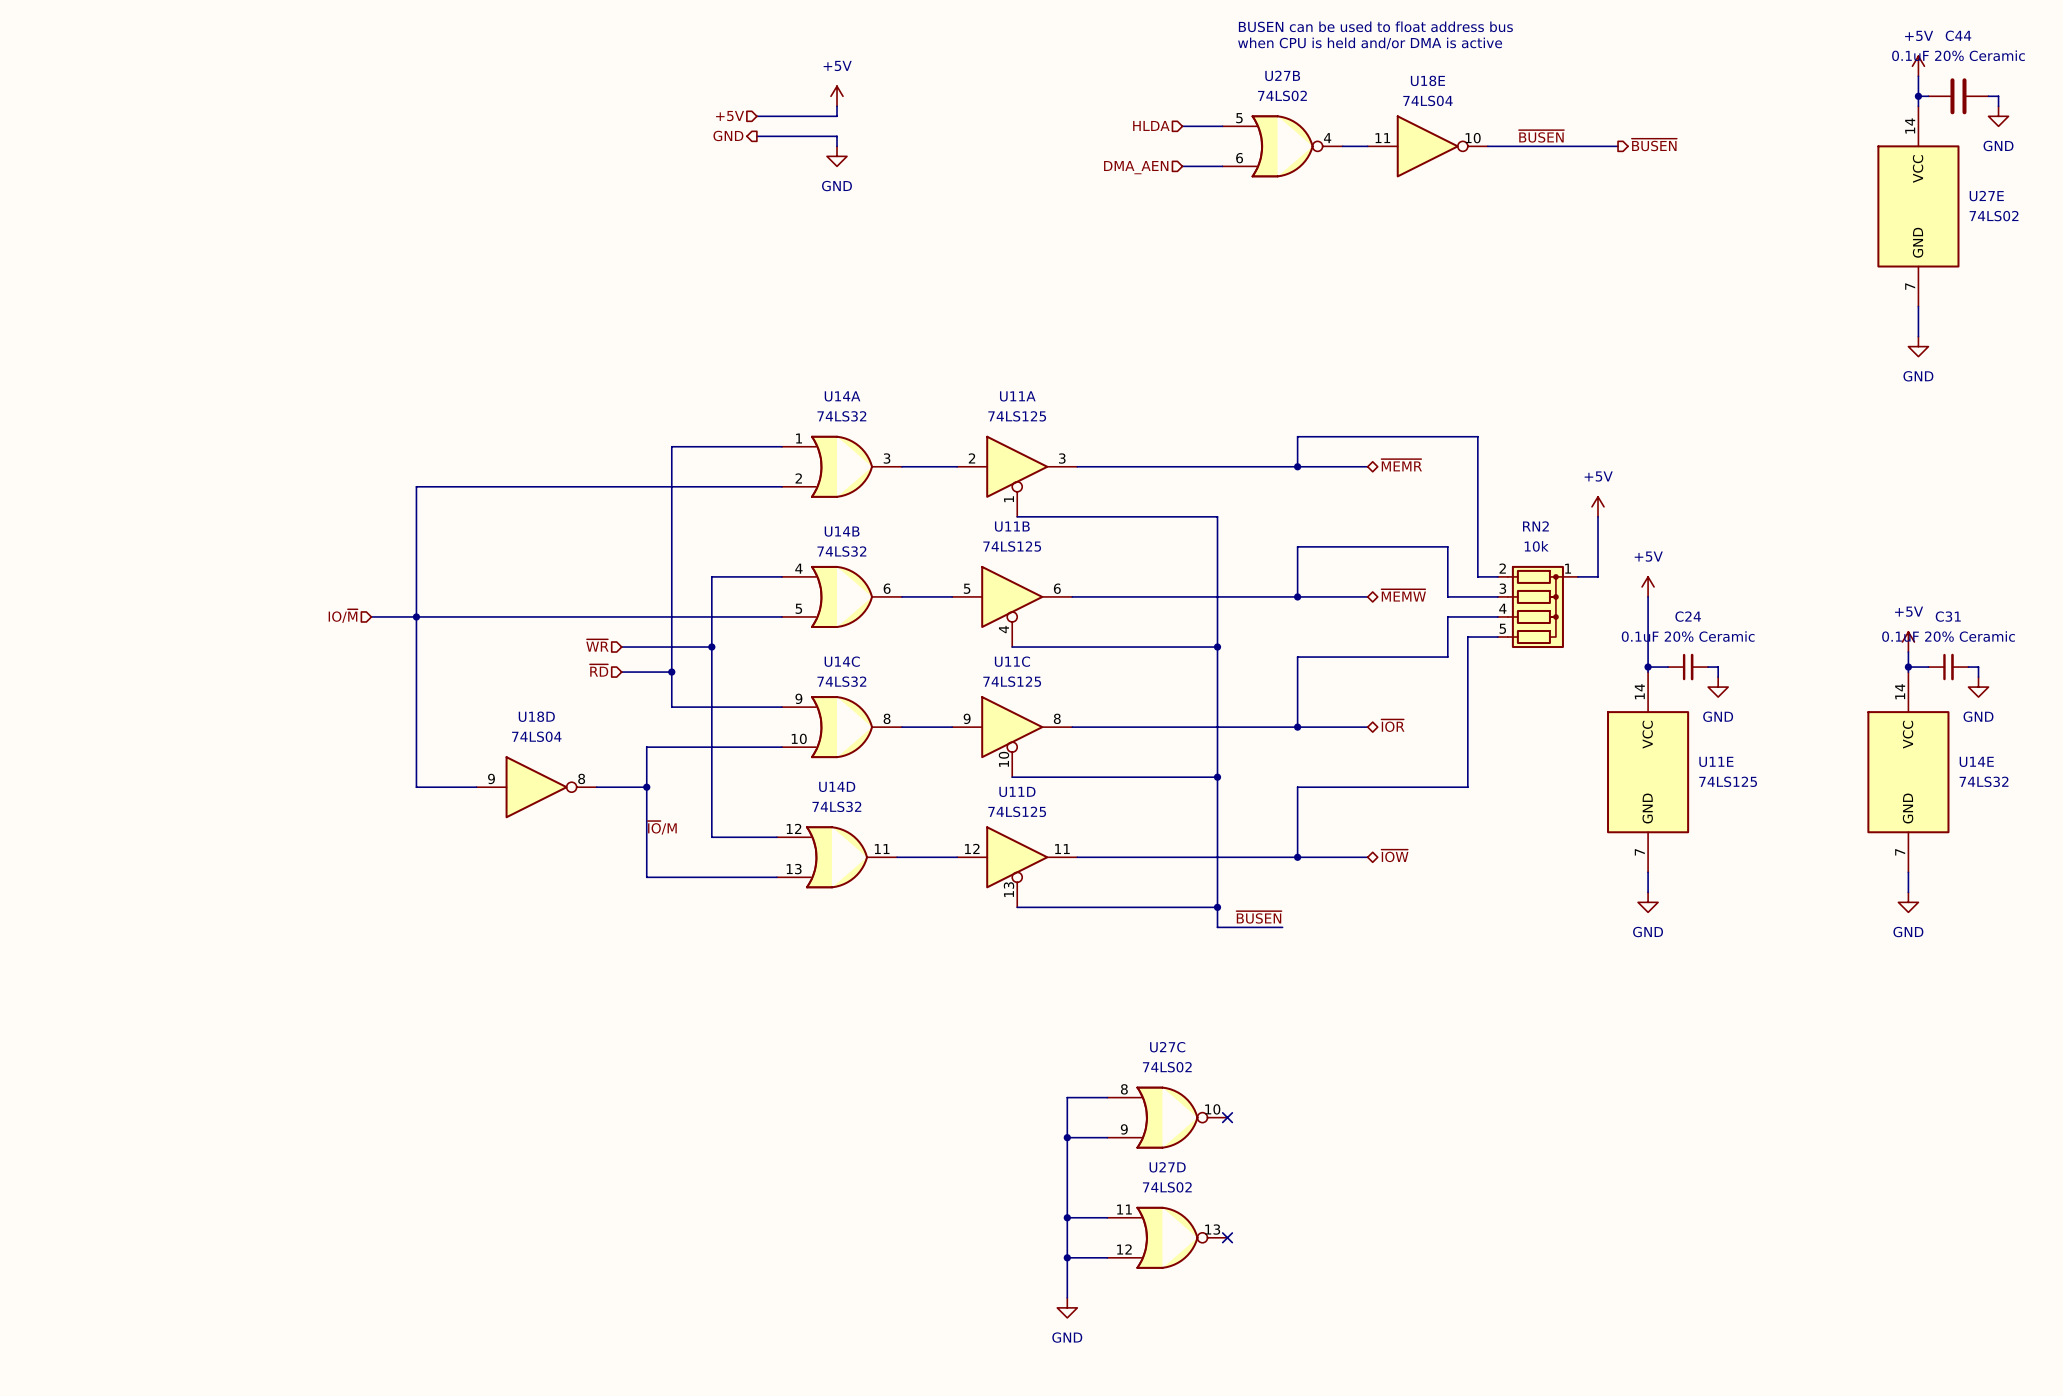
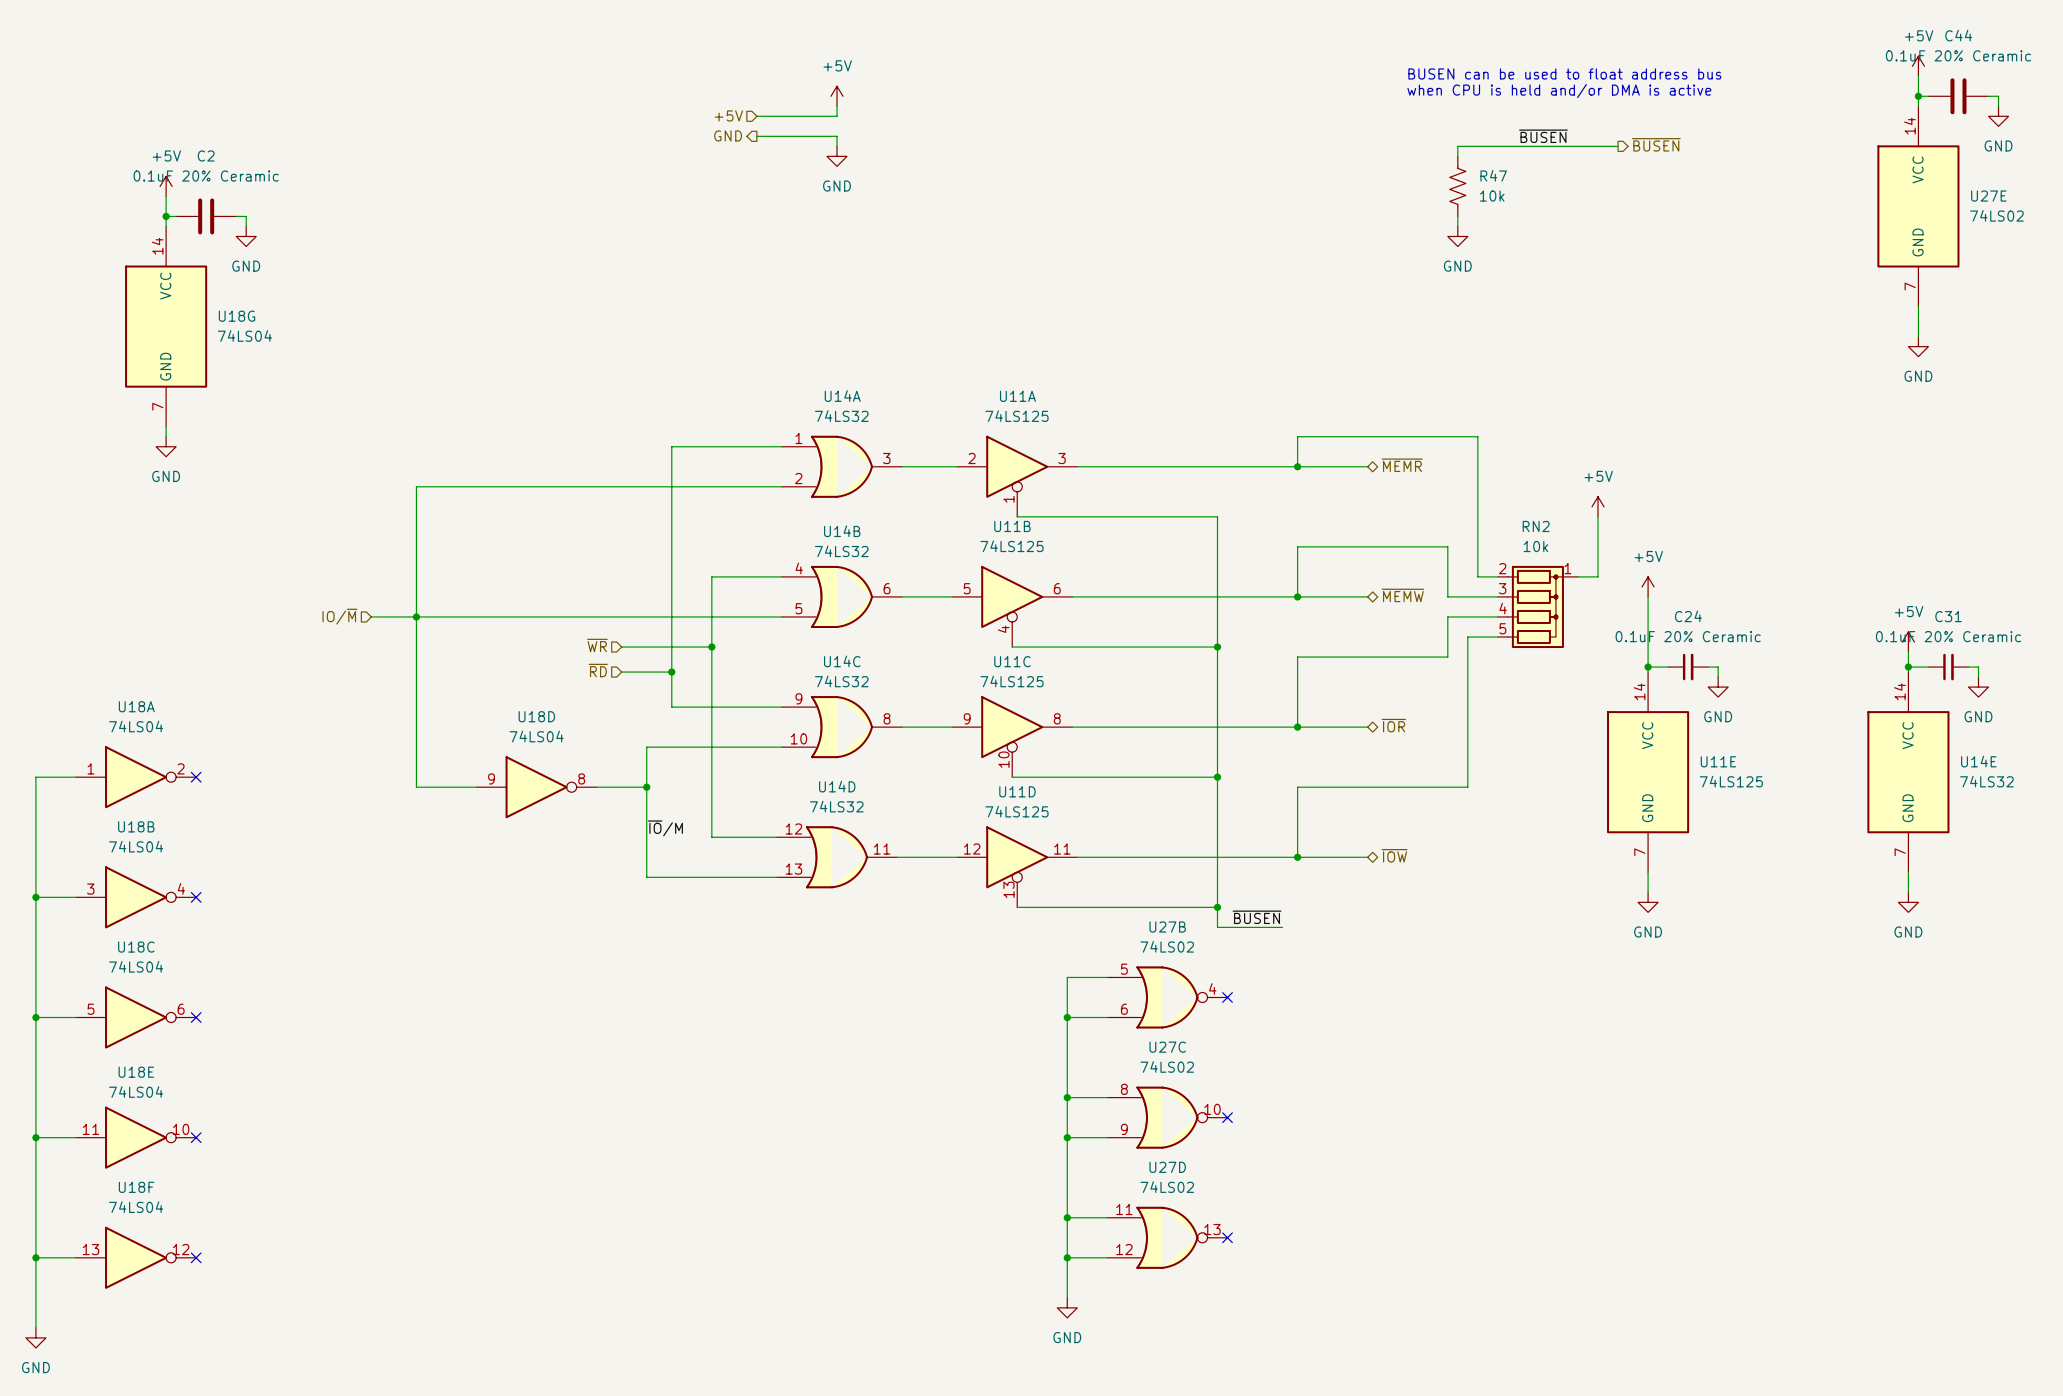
text position: BUSEN can be used to float address bus (1375, 26) -> BUSEN can be used to float address bus (1564, 73)
text position: when CPU is held and/or DMA is active (1370, 43) -> when CPU is held and/or DMA is active (1559, 91)
hierarchical label: HLDA (1151, 125) -> none
wire: (1182, 126) (1222, 126) -> none
U27B position: (1282, 146) -> (1167, 997)
wire: (1342, 146) (1367, 146) -> none
U18E position: (1427, 146) -> (136, 1137)
wire: (1182, 166) (1222, 166) -> none
hierarchical label: DMA_AEN (1136, 167) -> none
power symbol: none -> +5V (166, 186)
R47: none -> 10k (1457, 186)
wire: none -> (166, 196) (166, 226)
wire: none -> (166, 216) (176, 216)
junction: none -> (166, 216)
C2: none -> 0.1uF 20% Ceramic (206, 216)
wire: none -> (236, 216) (246, 216) (246, 226)
wire: none -> (1457, 216) (1457, 226)
power symbol: none -> GND (246, 236)
power symbol: none -> GND (1457, 236)
U18G: none -> 74LS04 (166, 326)
wire: none -> (166, 426) (166, 436)
power symbol: none -> GND (166, 446)
wire: none -> (75, 777) (35, 777) (35, 1327)
U18A: none -> 74LS04 (136, 777)
no-connect mark: none -> (196, 777)
wire: none -> (35, 897) (75, 897)
junction: none -> (35, 897)
U18B: none -> 74LS04 (136, 897)
no-connect mark: none -> (196, 897)
wire: none -> (1107, 977) (1067, 977) (1067, 1097)
no-connect mark: none -> (1227, 997)
wire: none -> (35, 1017) (75, 1017)
junction: none -> (35, 1017)
U18C: none -> 74LS04 (136, 1017)
no-connect mark: none -> (196, 1017)
wire: none -> (1067, 1017) (1107, 1017)
junction: none -> (1067, 1017)
junction: none -> (1067, 1097)
wire: none -> (35, 1137) (75, 1137)
junction: none -> (35, 1137)
no-connect mark: none -> (196, 1137)
wire: none -> (35, 1257) (75, 1257)
junction: none -> (35, 1257)
U18F: none -> 74LS04 (136, 1257)
no-connect mark: none -> (196, 1257)
power symbol: none -> GND (35, 1337)

